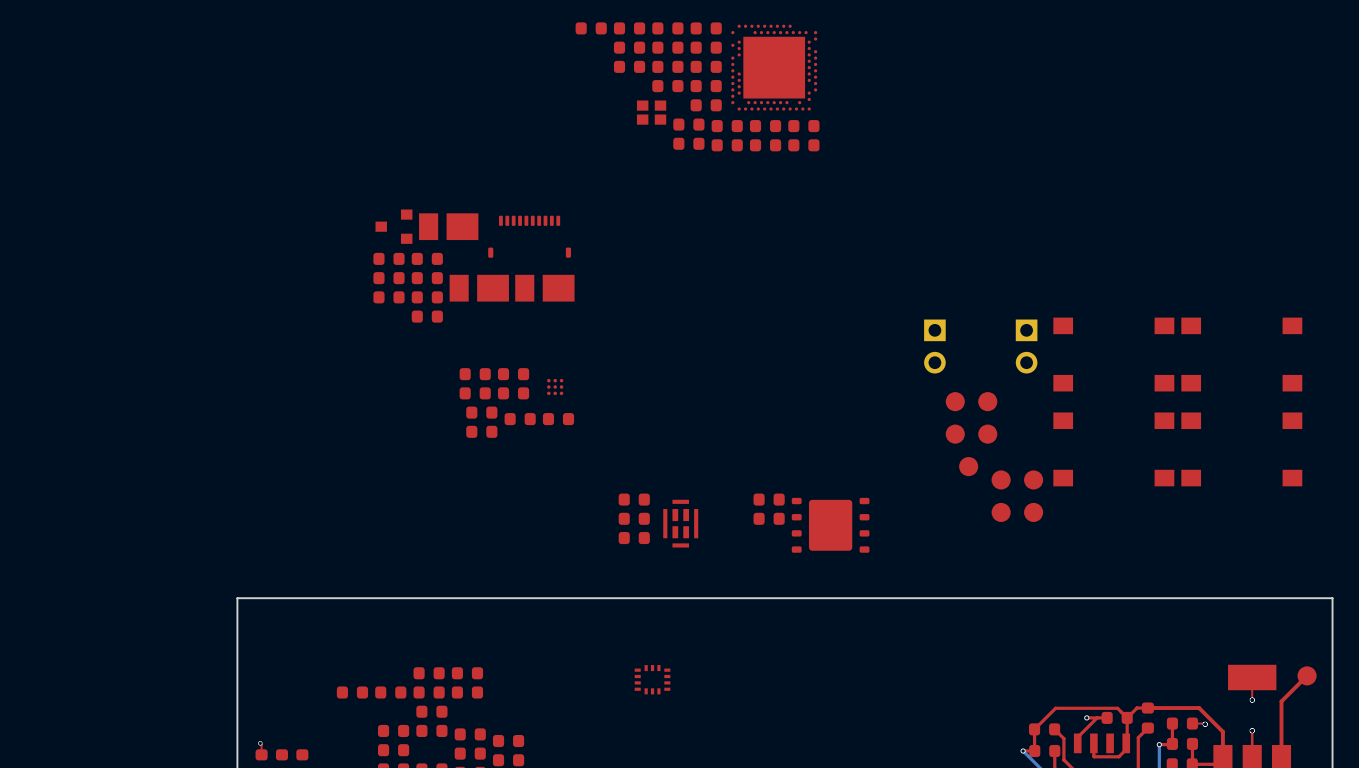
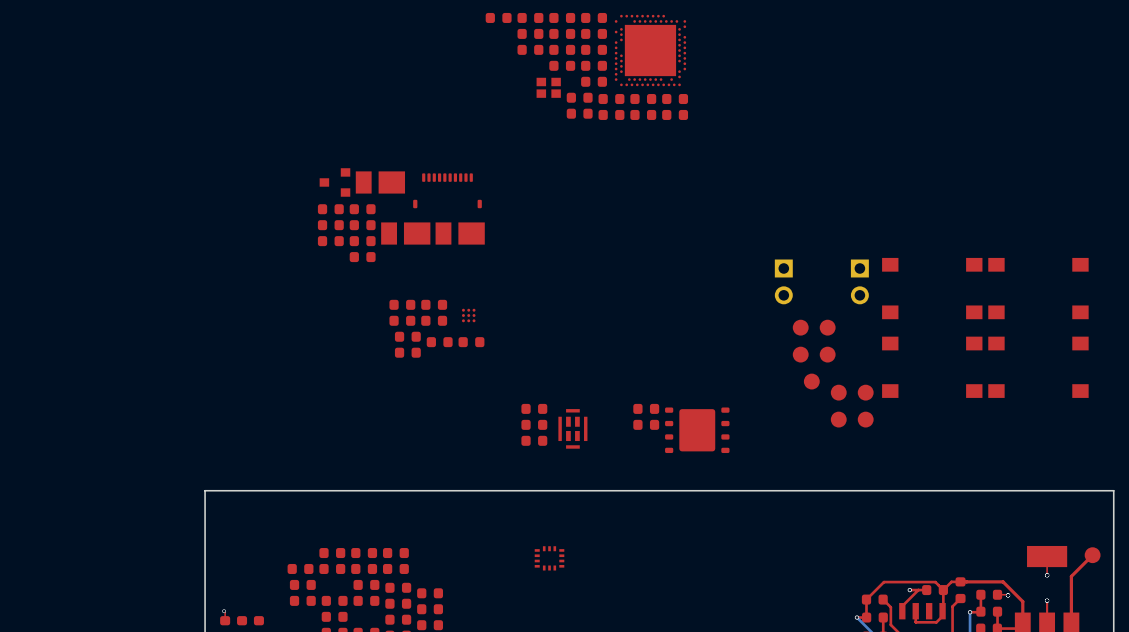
part: none -> (332, 553)
part: none -> (302, 584)
part: none -> (398, 587)
part: none -> (430, 593)
part: none -> (302, 600)

